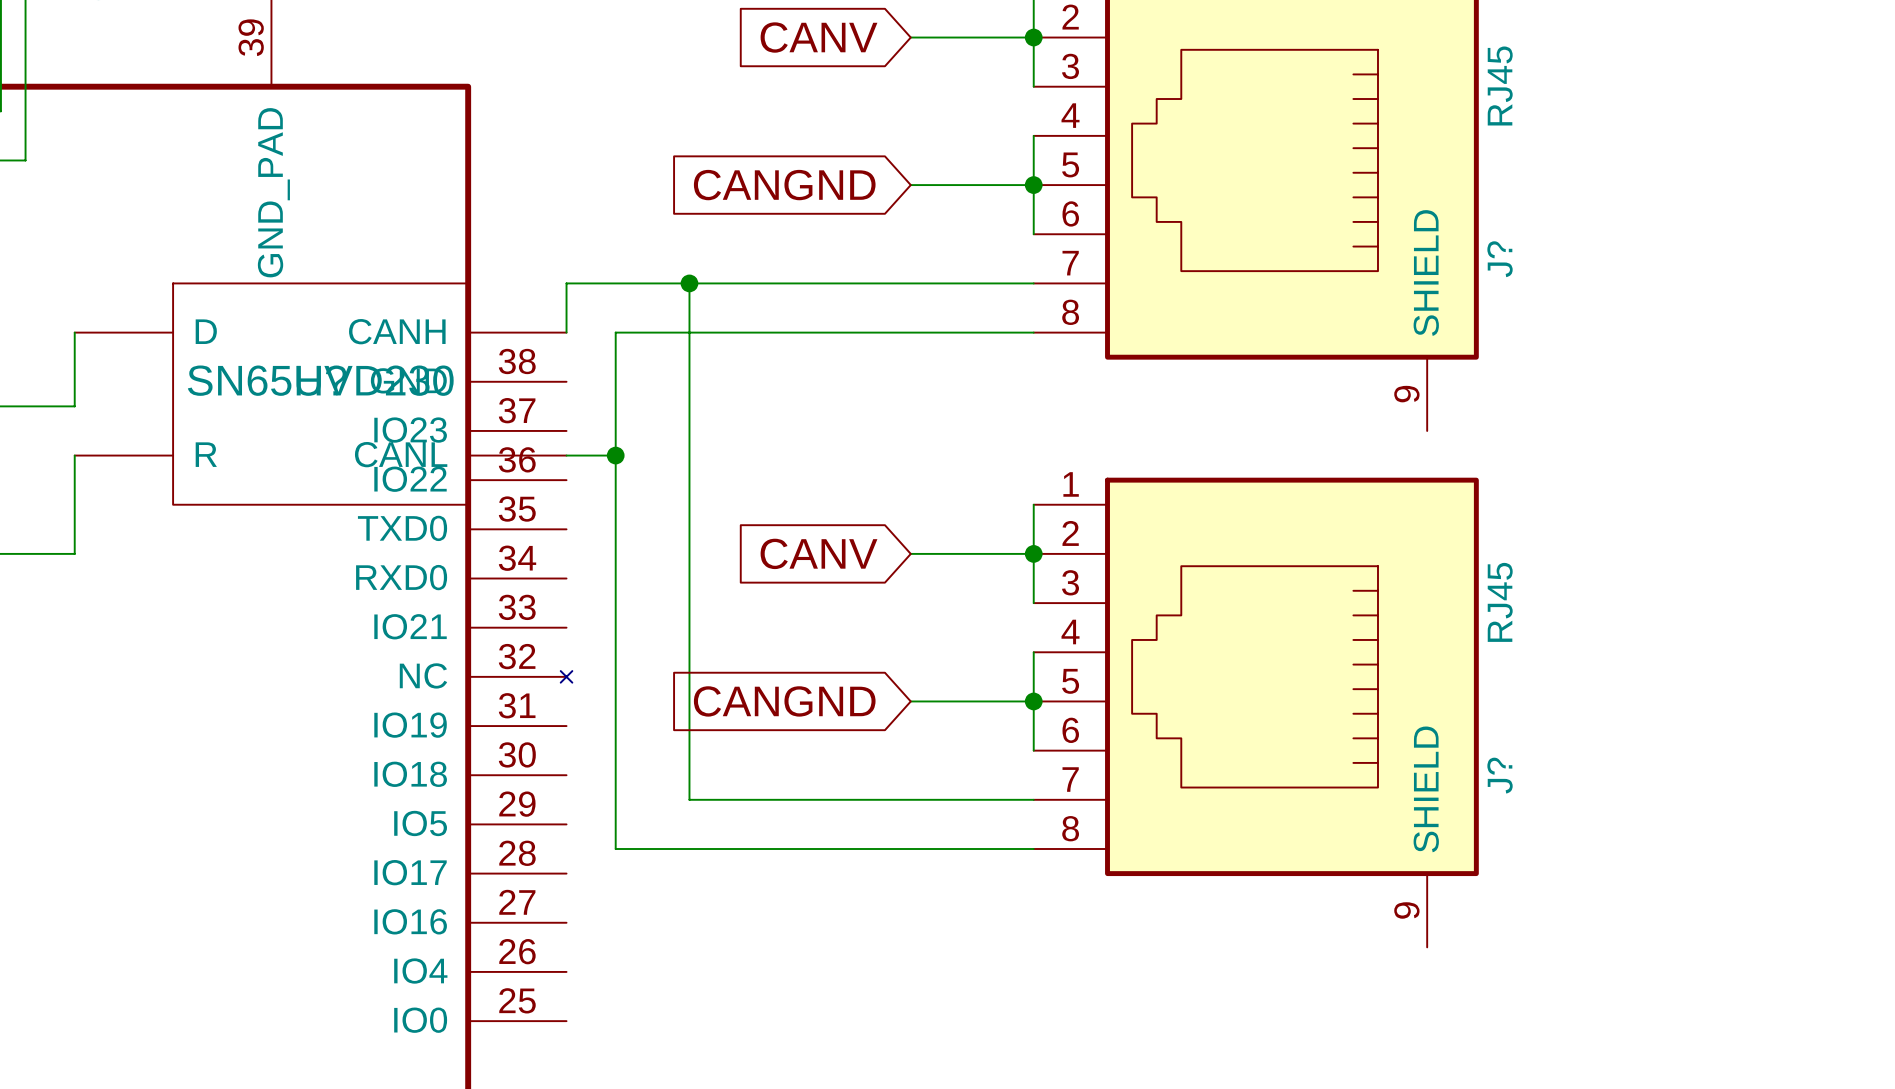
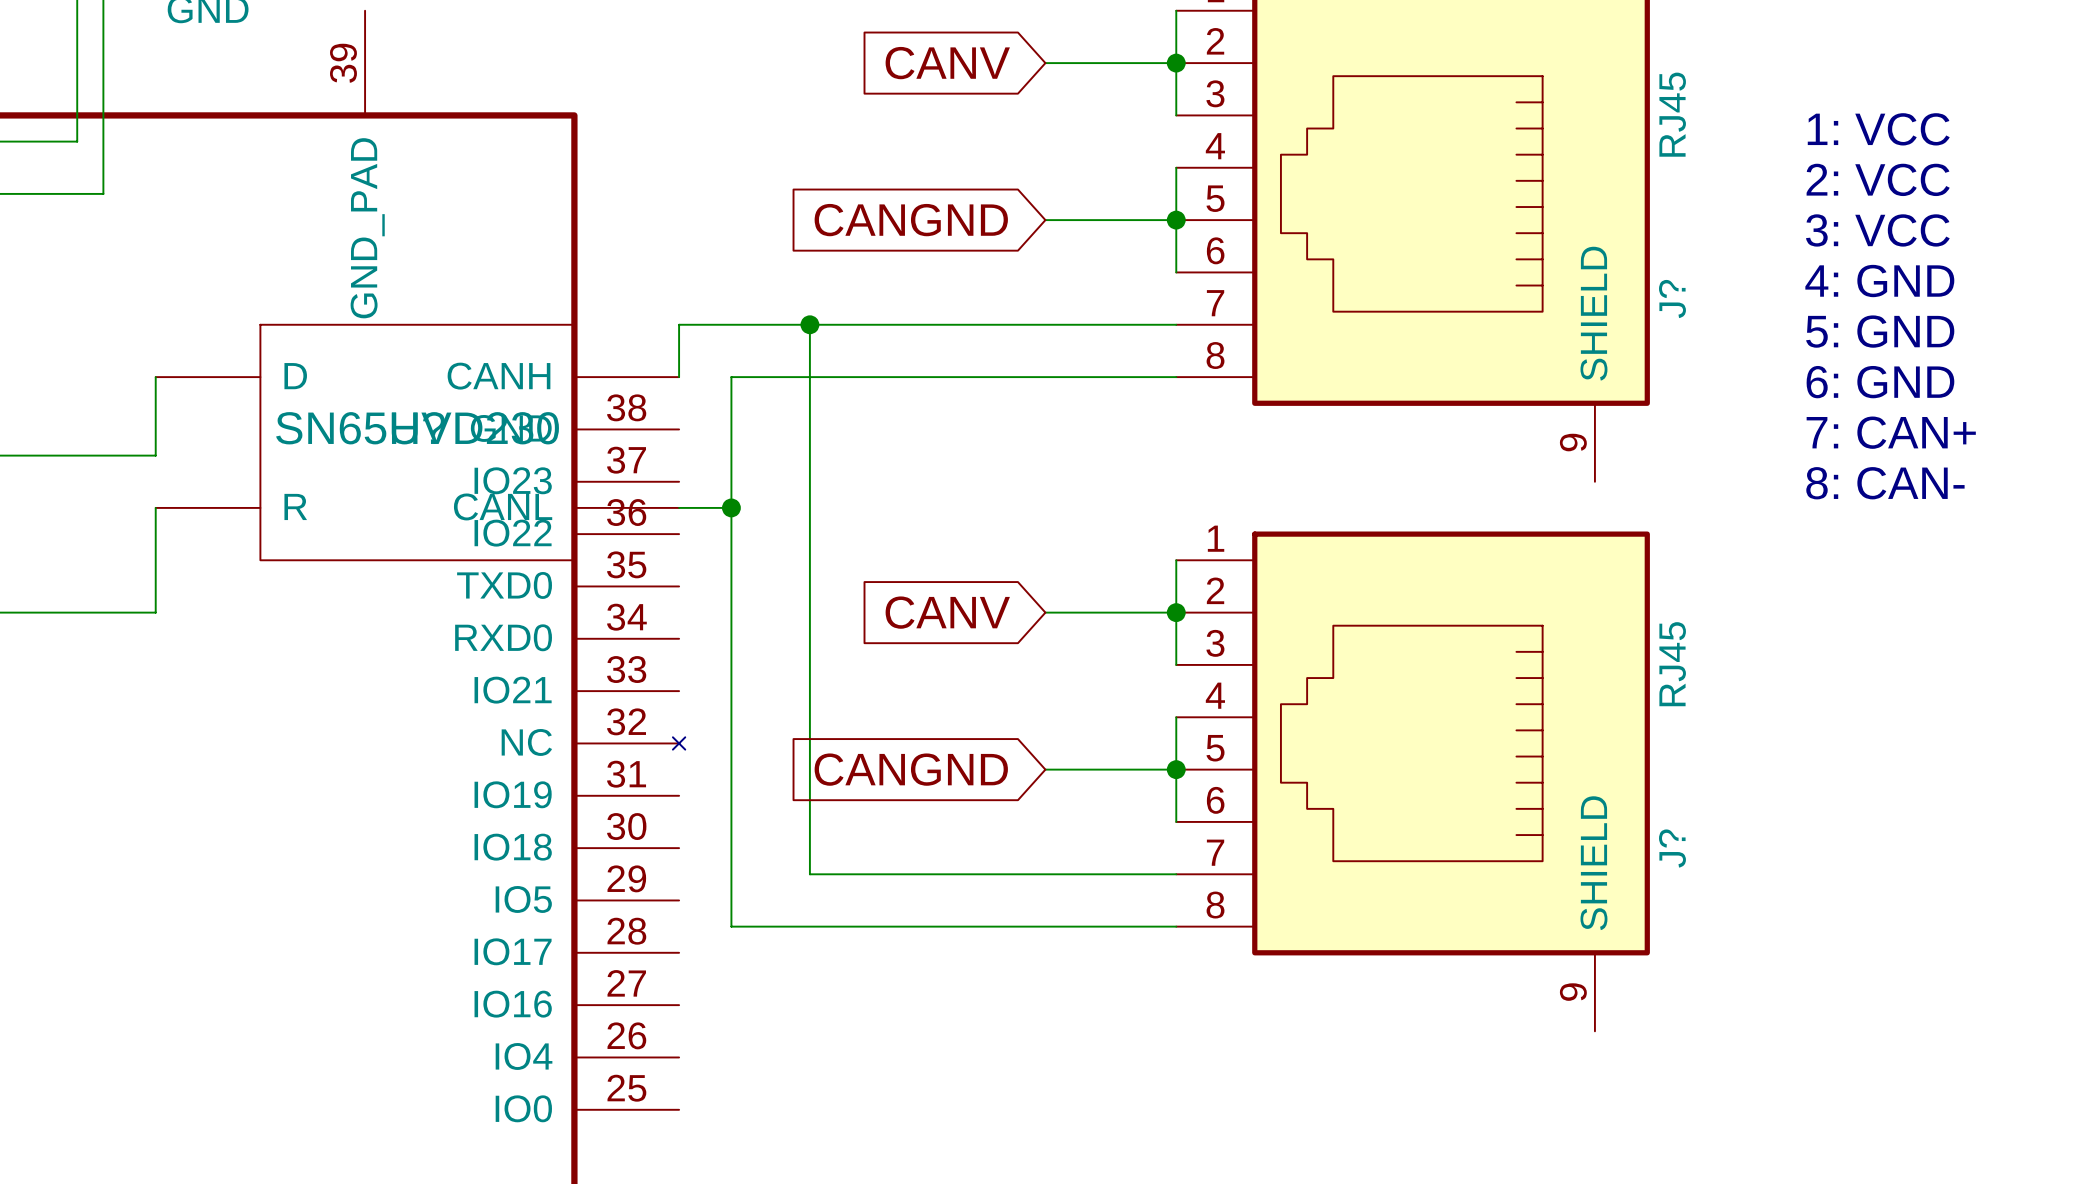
text: none -> 1: VCC (1878, 129)
text: none -> 2: VCC (1878, 179)
text: none -> 3: VCC (1877, 230)
text: none -> 4: GND (1879, 281)
text: none -> 5: GND (1880, 331)
text: none -> 6: GND (1880, 382)
text: none -> 7: CAN+ (1891, 432)
text: none -> 8: CAN- (1885, 483)

